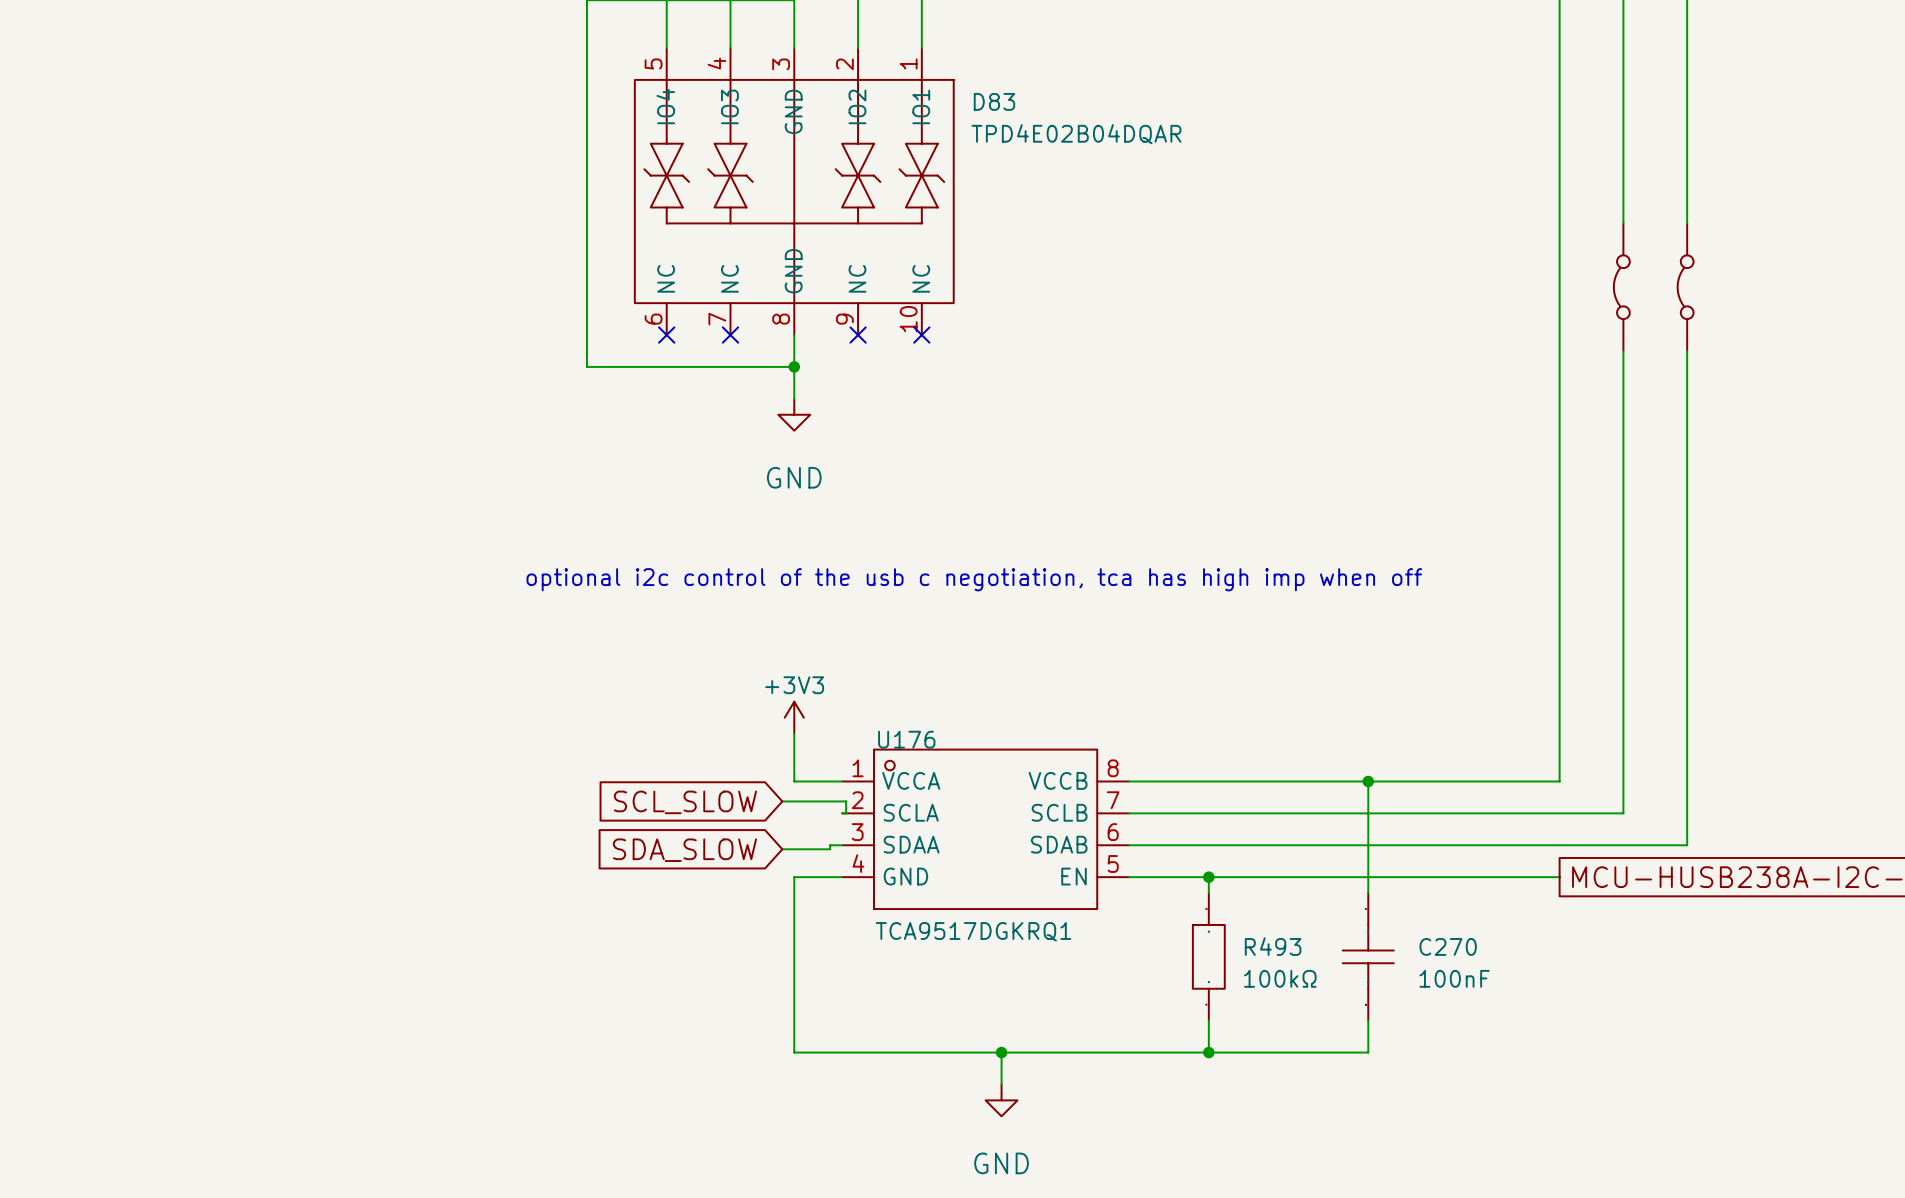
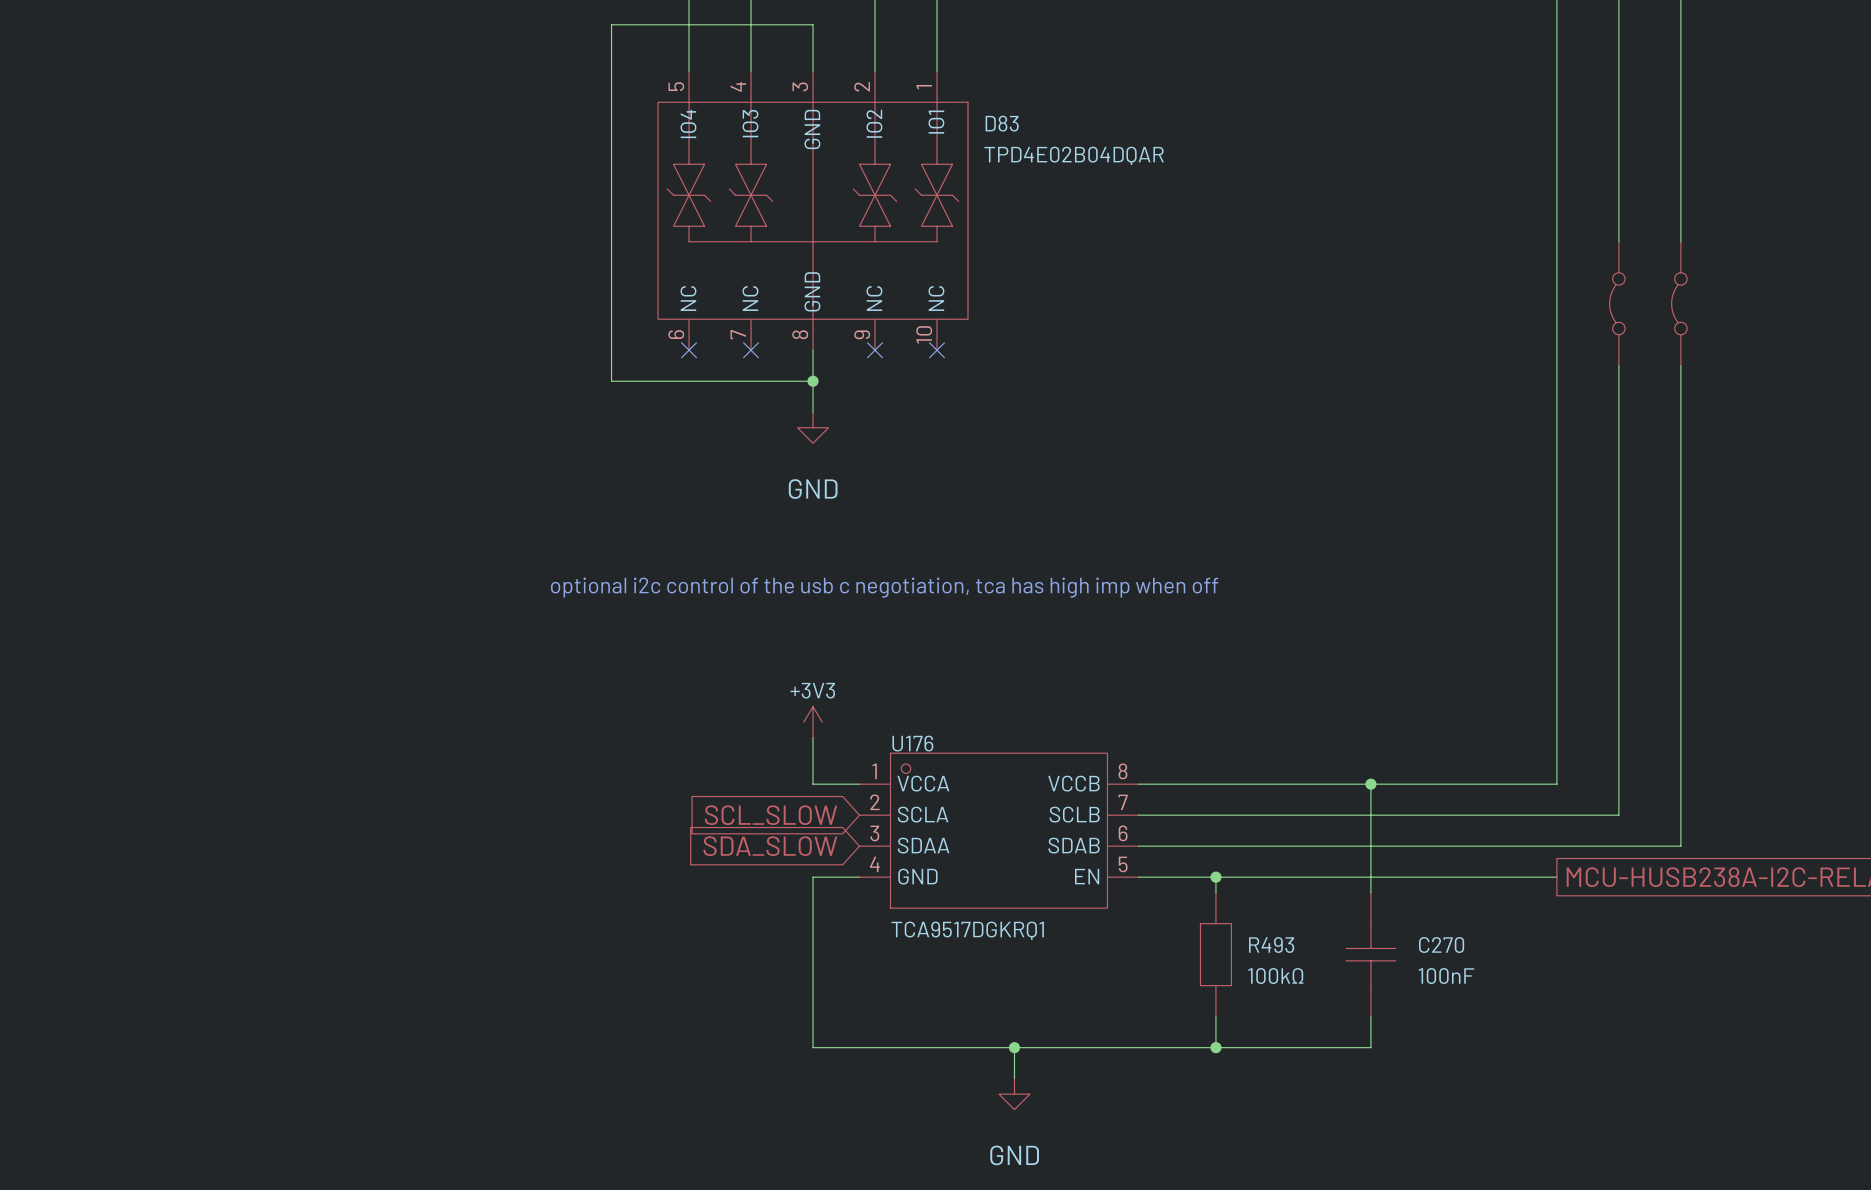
wire: (782, 801) (846, 801) (846, 813) (842, 813) -> none
global label position: SCL_SLOW (685, 802) -> SCL_SLOW (771, 815)
wire: (842, 845) (830, 845) (830, 849) (782, 849) -> none
global label position: SDA_SLOW (684, 850) -> SDA_SLOW (770, 846)

